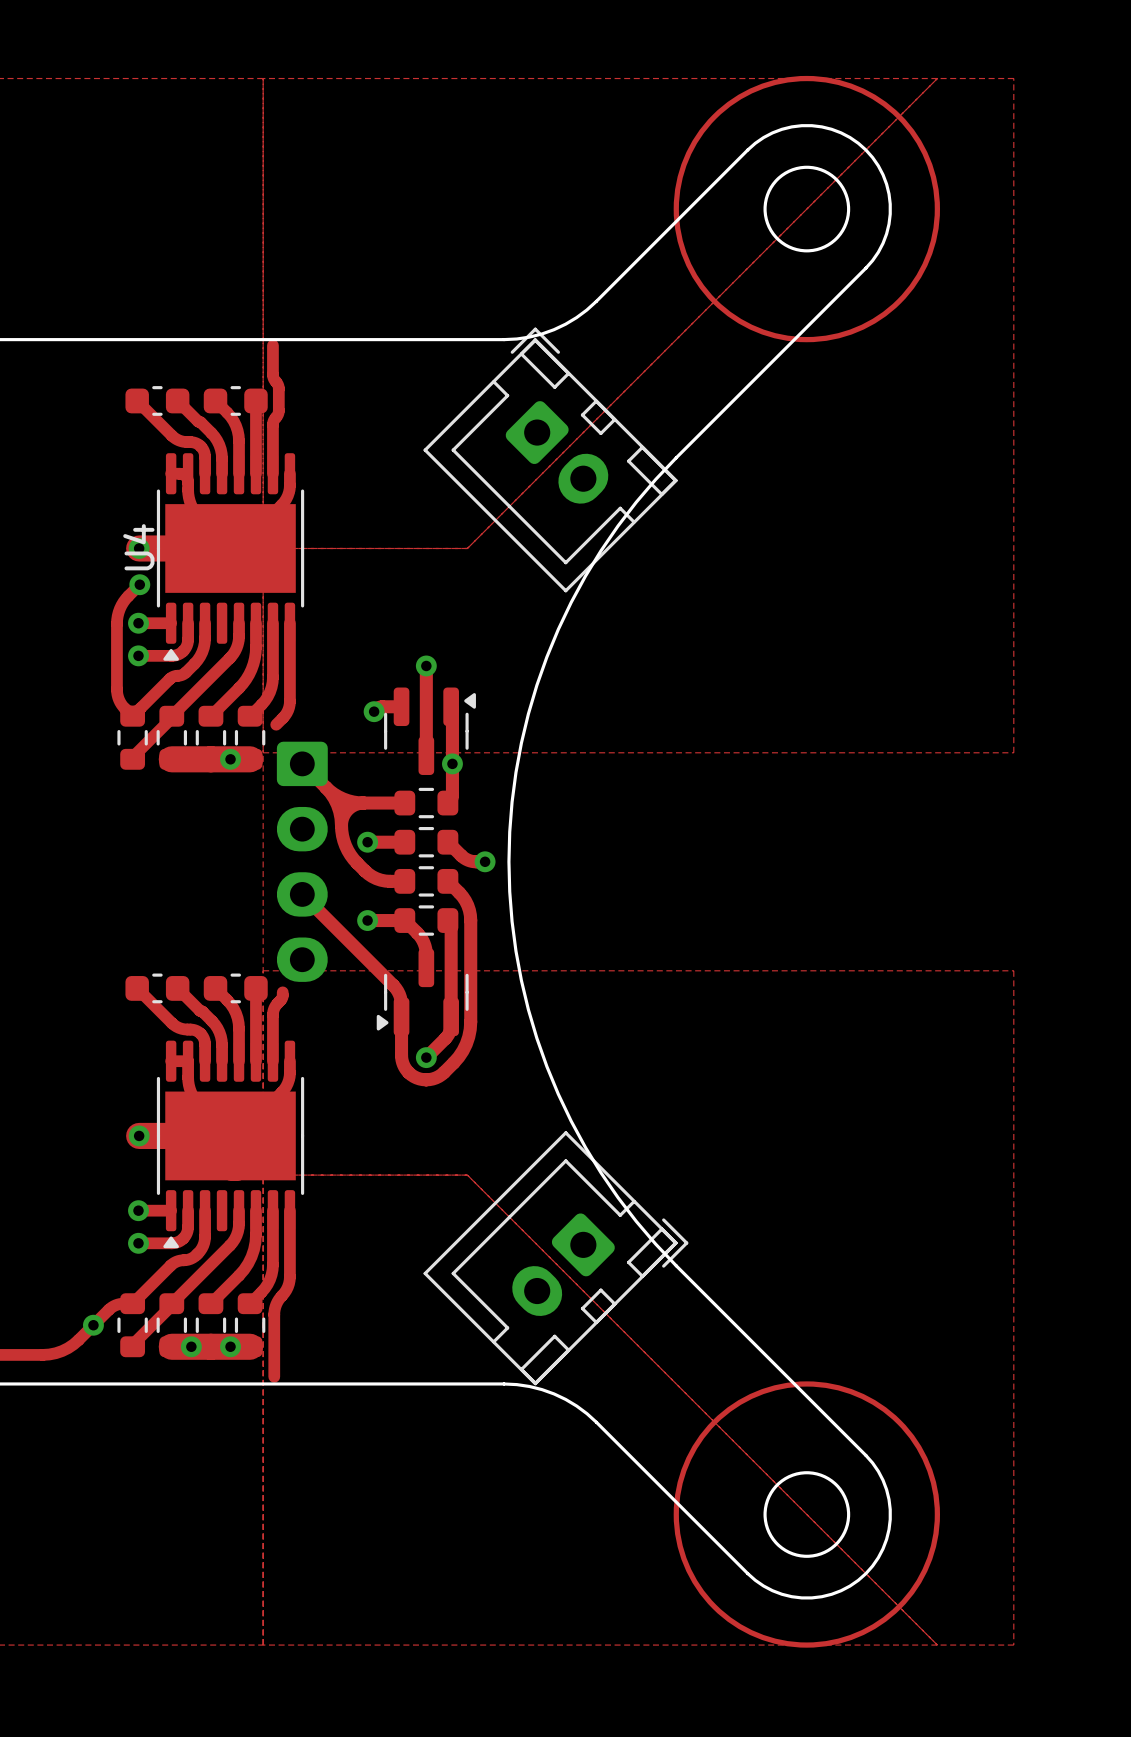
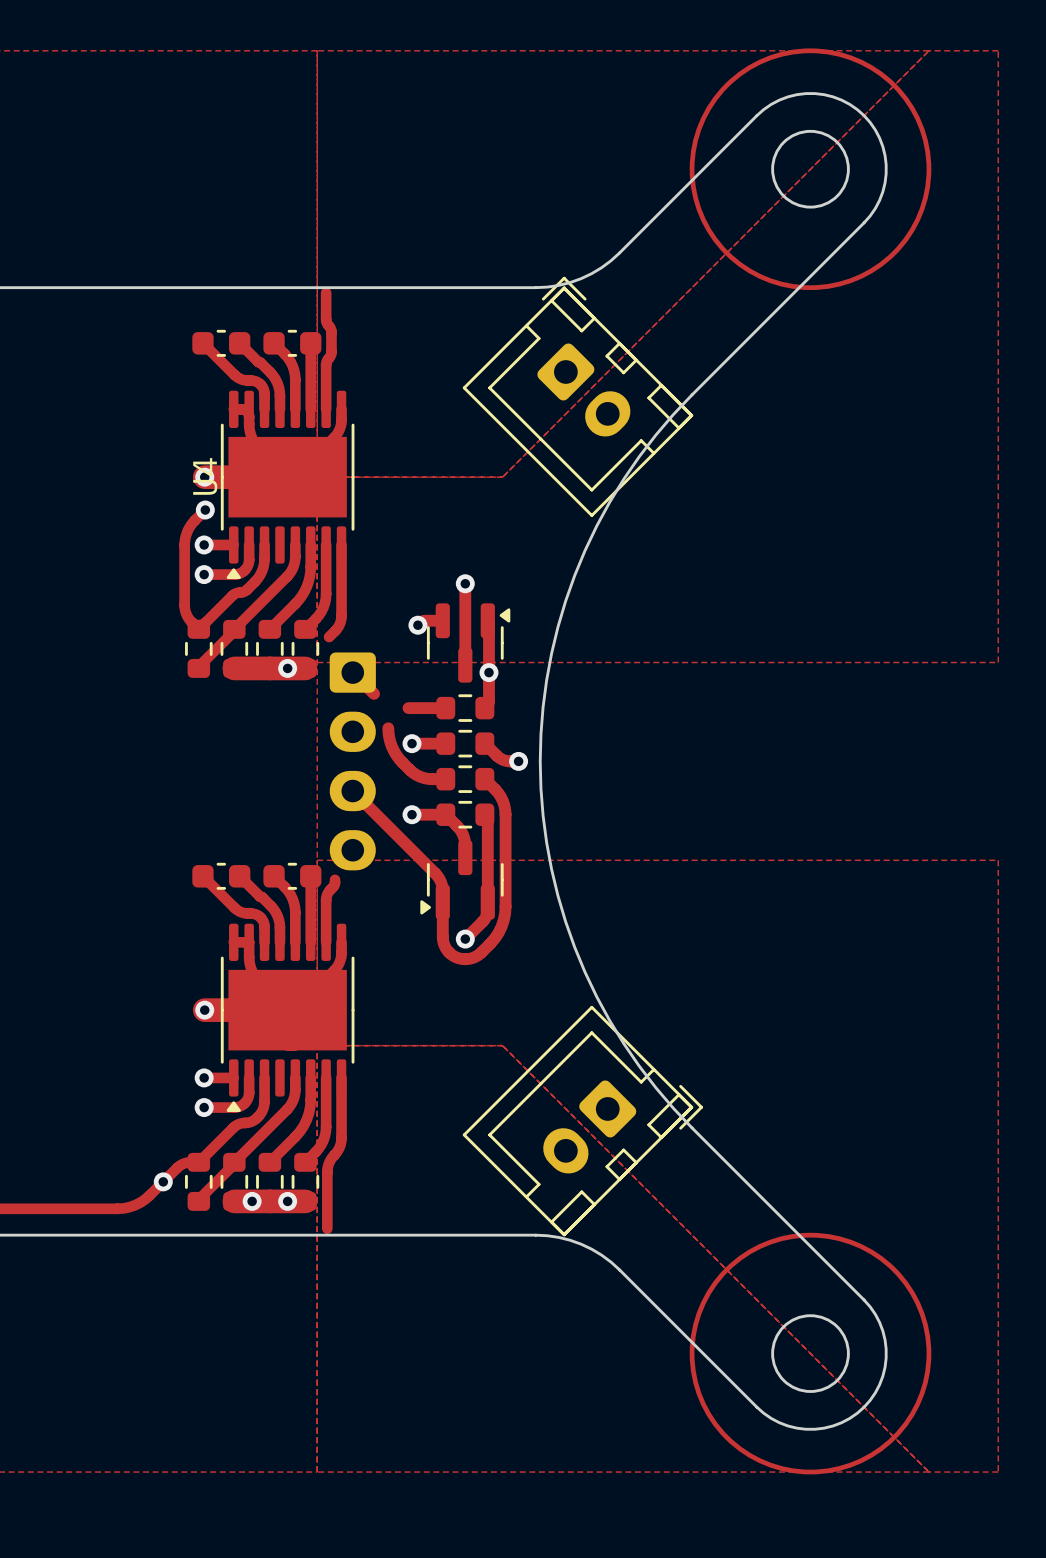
track: (325, 787) (337, 804) (341, 825) (343, 816) (348, 809) (355, 804) (363, 803) (343, 798) (325, 787) -> none

